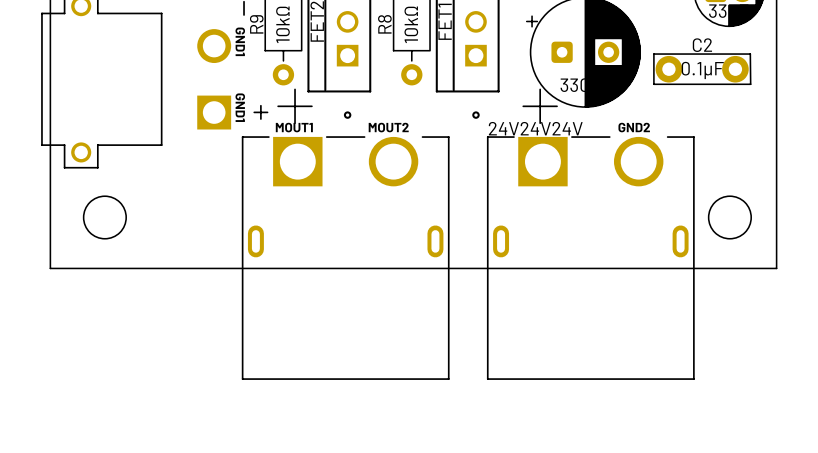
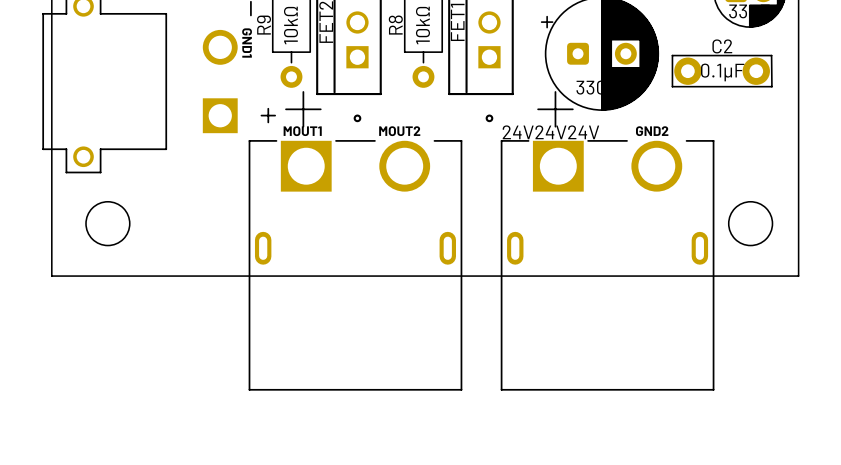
text: GND1 (240, 107) -> none

